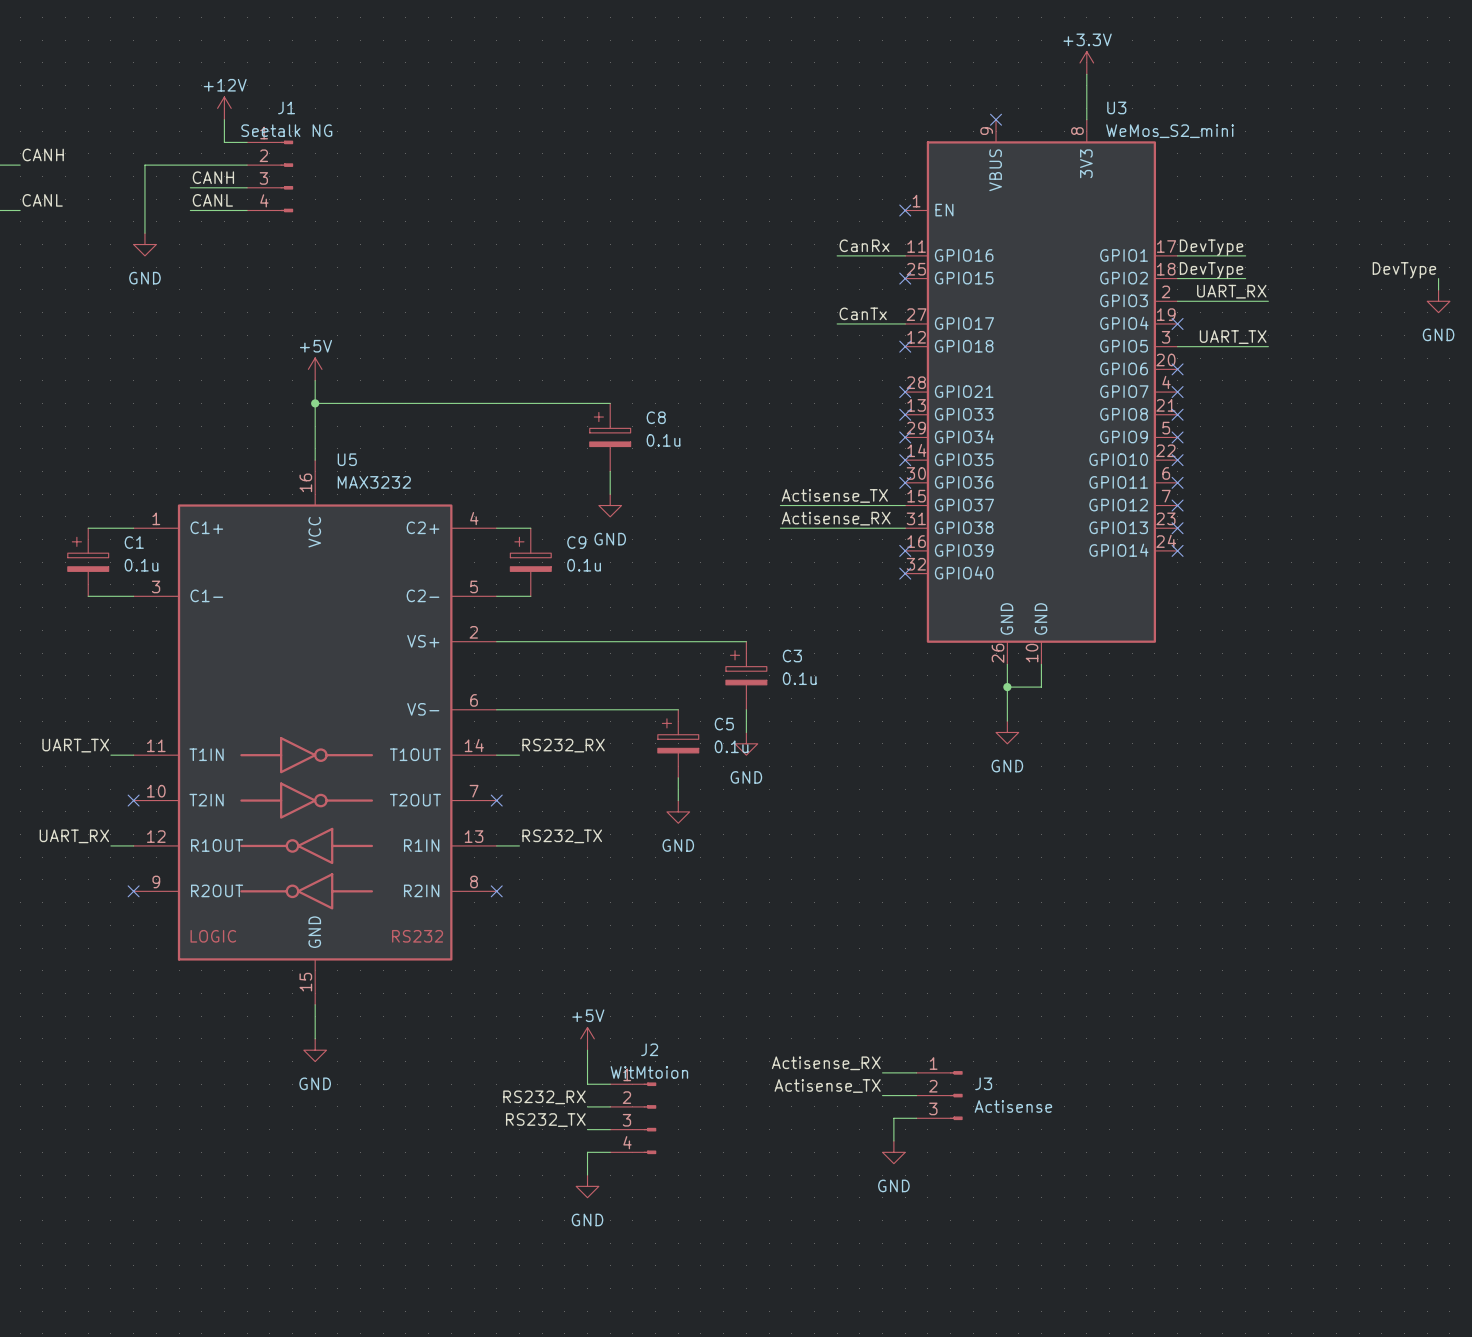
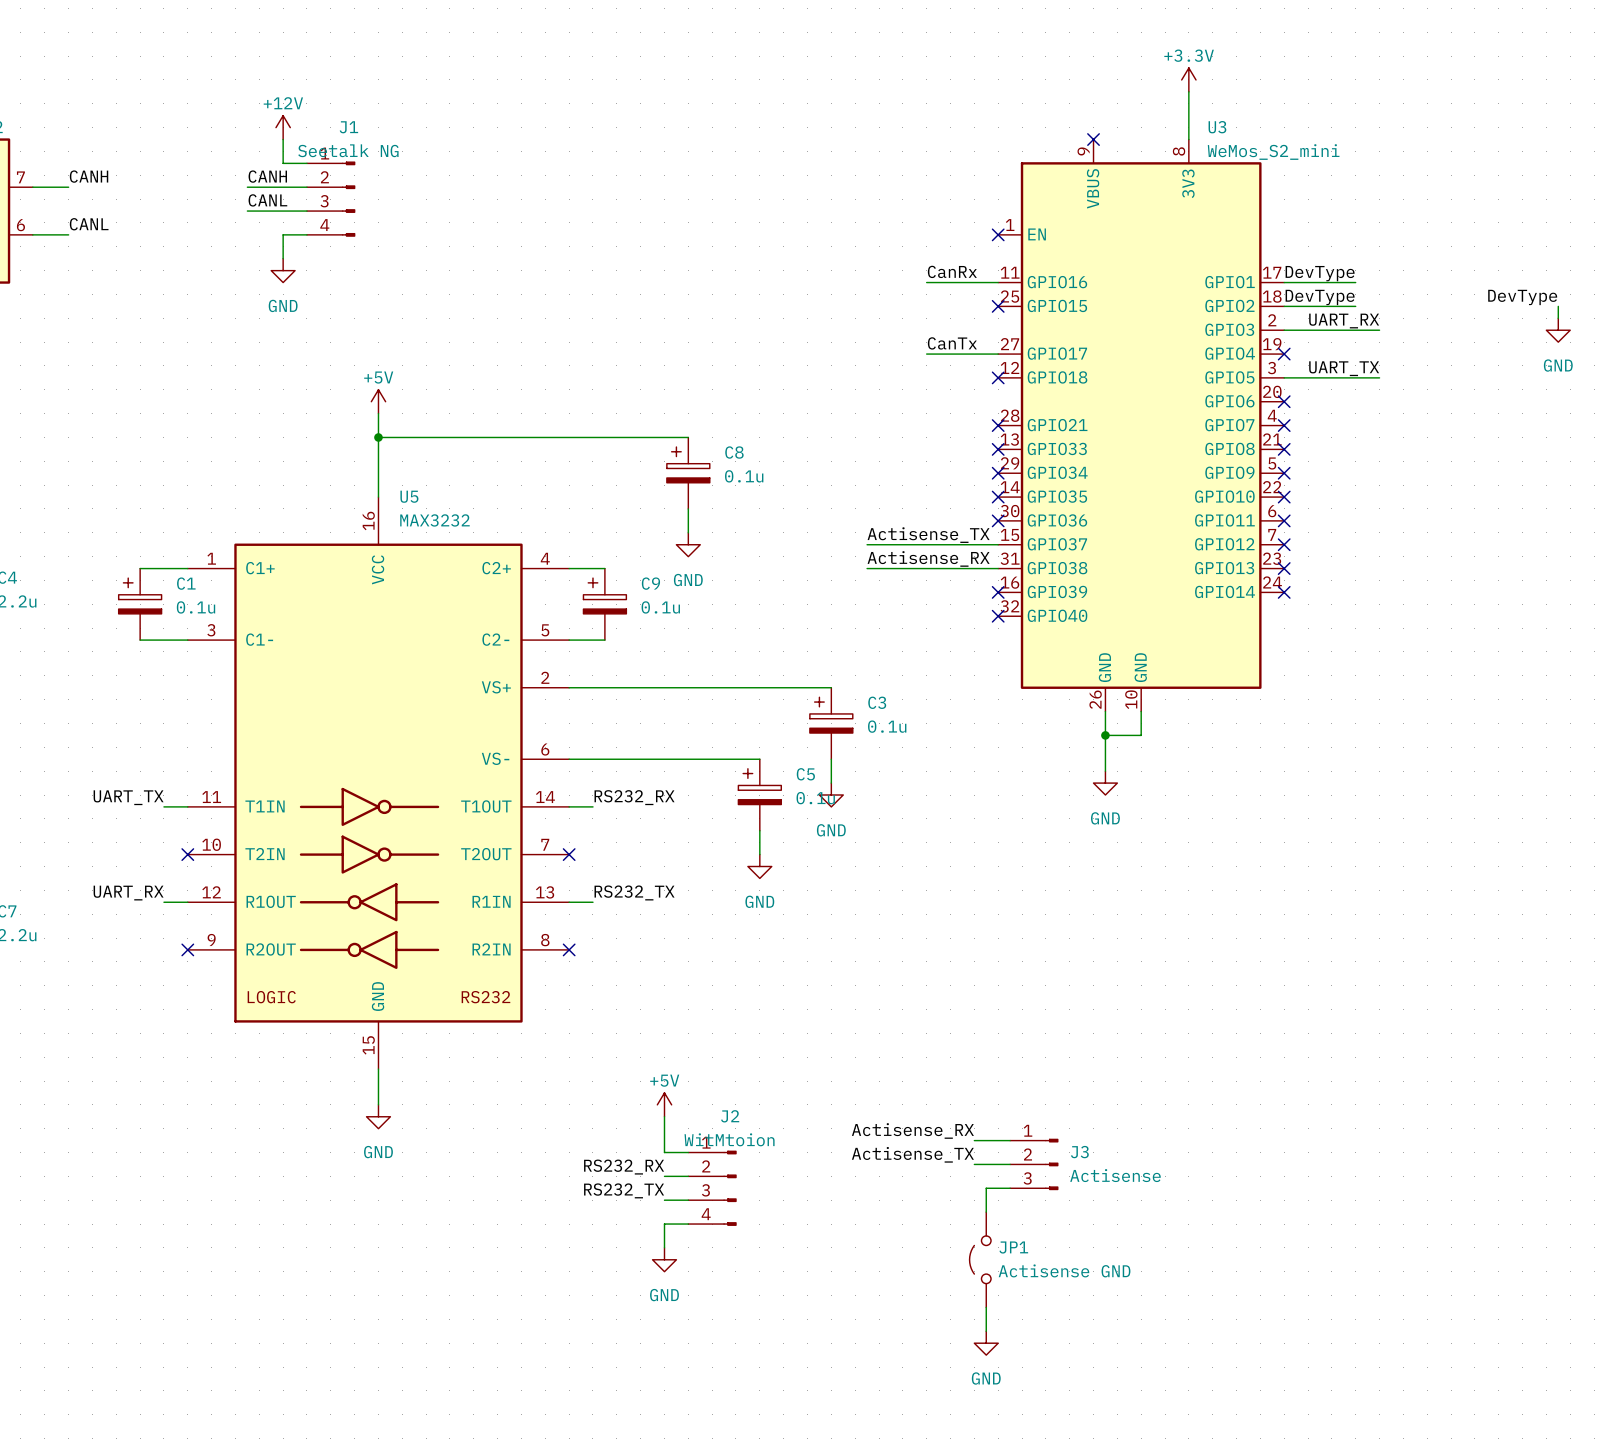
label: none -> CANH (267, 176)
wire: (190, 165) (144, 165) (144, 233) -> none
label: CANH (213, 177) -> CANL (267, 200)
label: CANL (212, 200) -> none
wire: (190, 210) (224, 210) -> (283, 258) (283, 234)
power symbol position: GND (144, 244) -> GND (283, 270)
power symbol position: GND (893, 1152) -> GND (986, 1343)
JP1: none -> Actisense GND (980, 1259)
wire: none -> (986, 1307) (986, 1331)

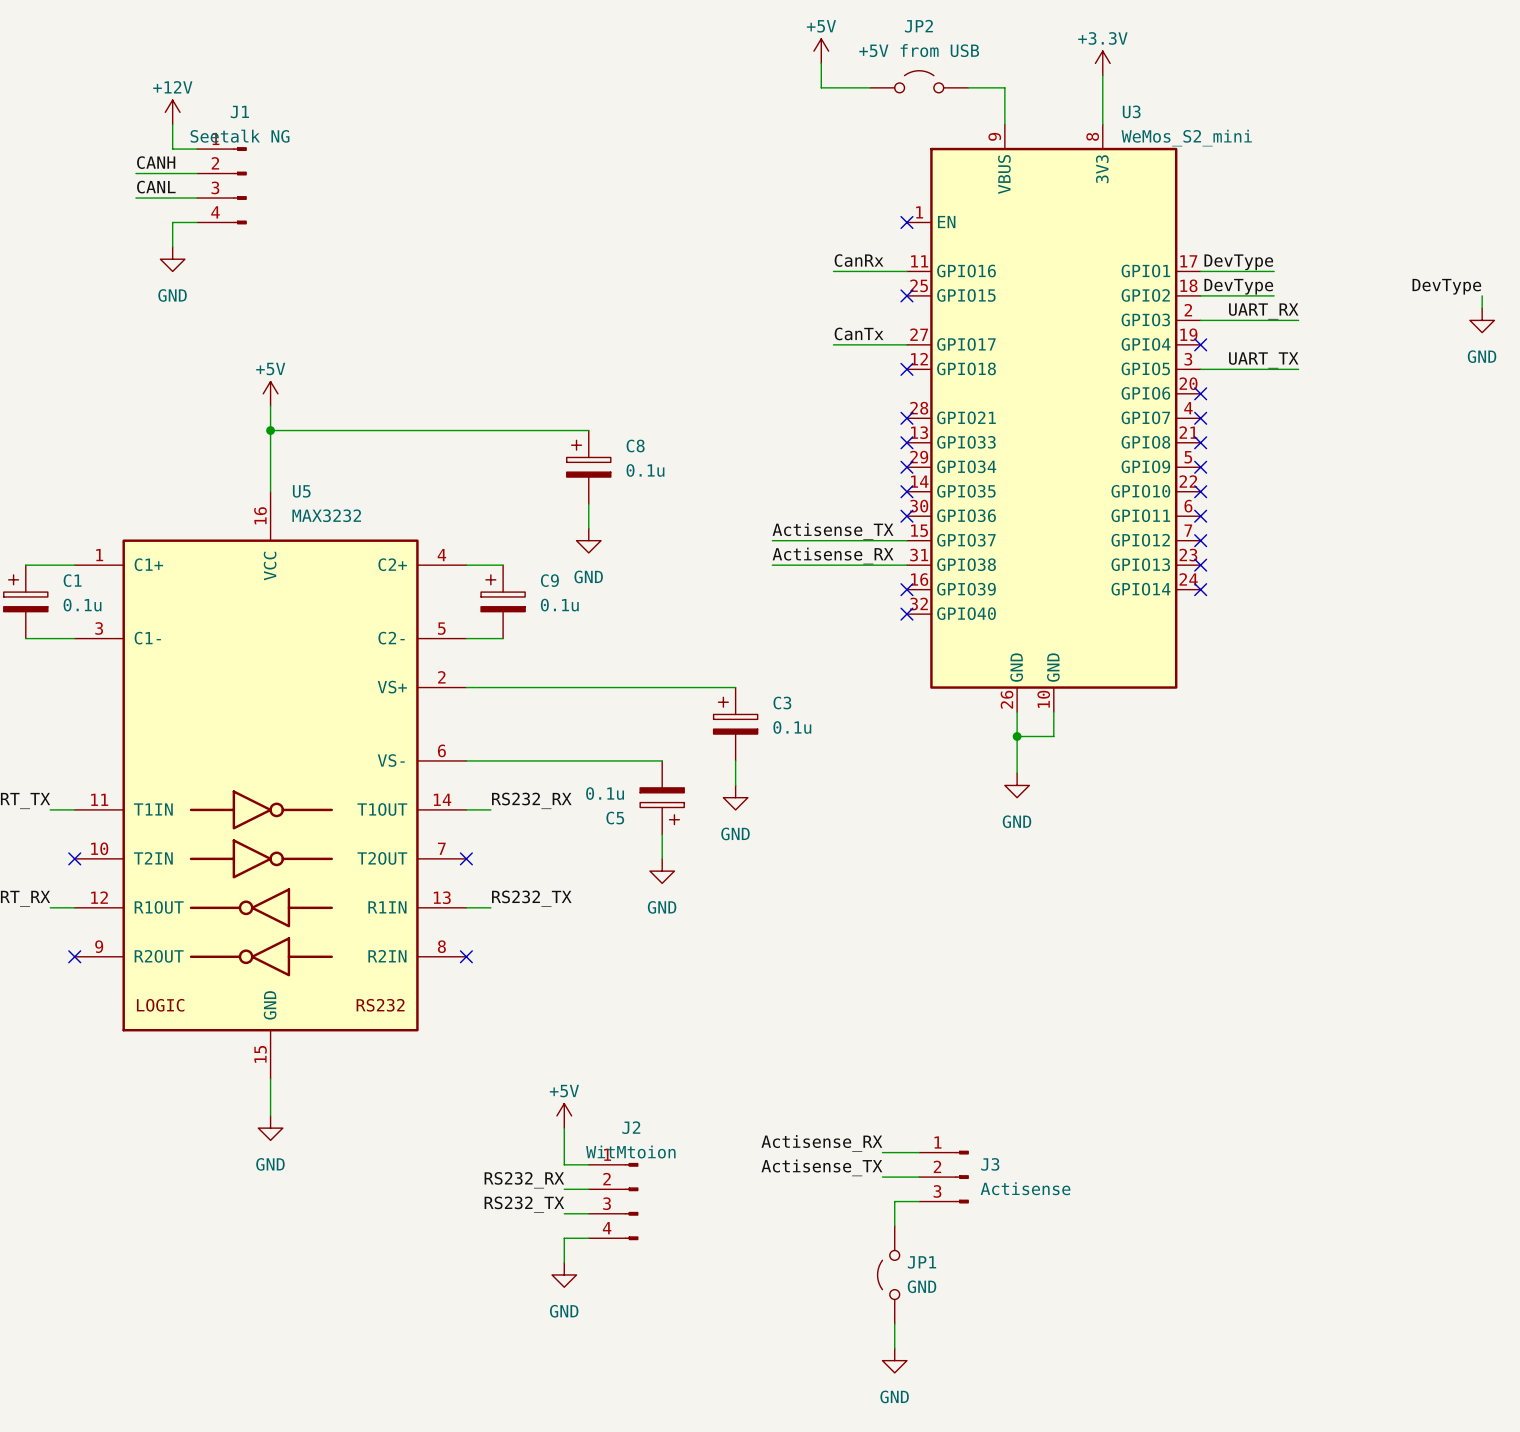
power symbol: none -> +5V (821, 51)
wire: none -> (821, 63) (821, 87) (870, 87)
JP2: none -> +5V from USB (919, 81)
wire: none -> (968, 87) (1004, 87) (1004, 124)
no-connect mark: (1093, 139) -> none
C5 rotation: 0° (759, 786) -> 180° (662, 806)
JP1 value: Actisense GND (1064, 1270) -> GND (922, 1286)

